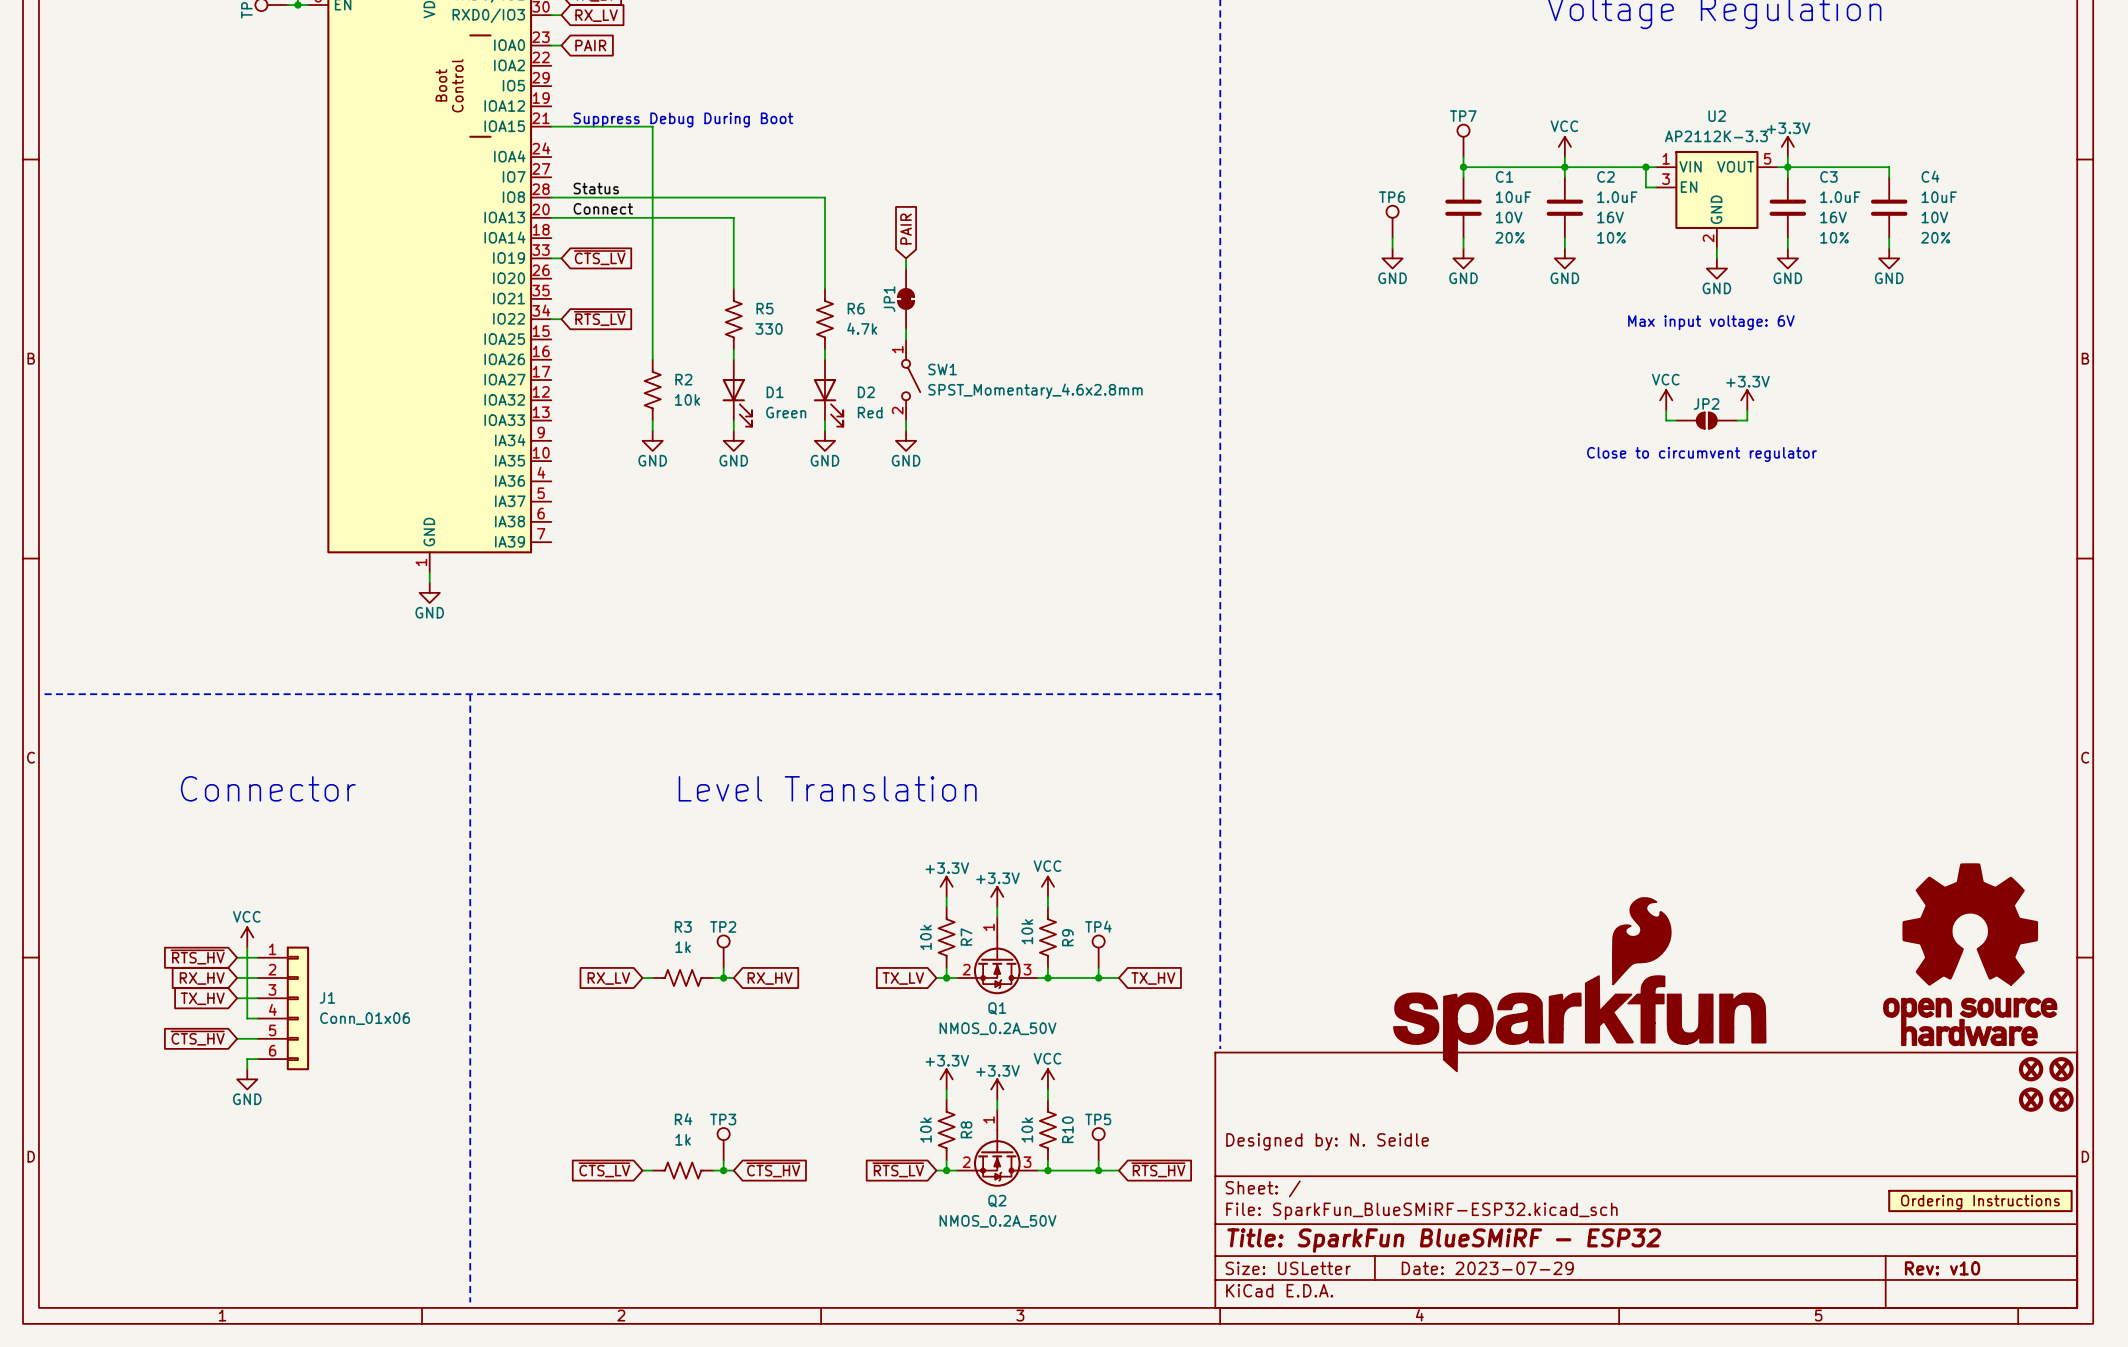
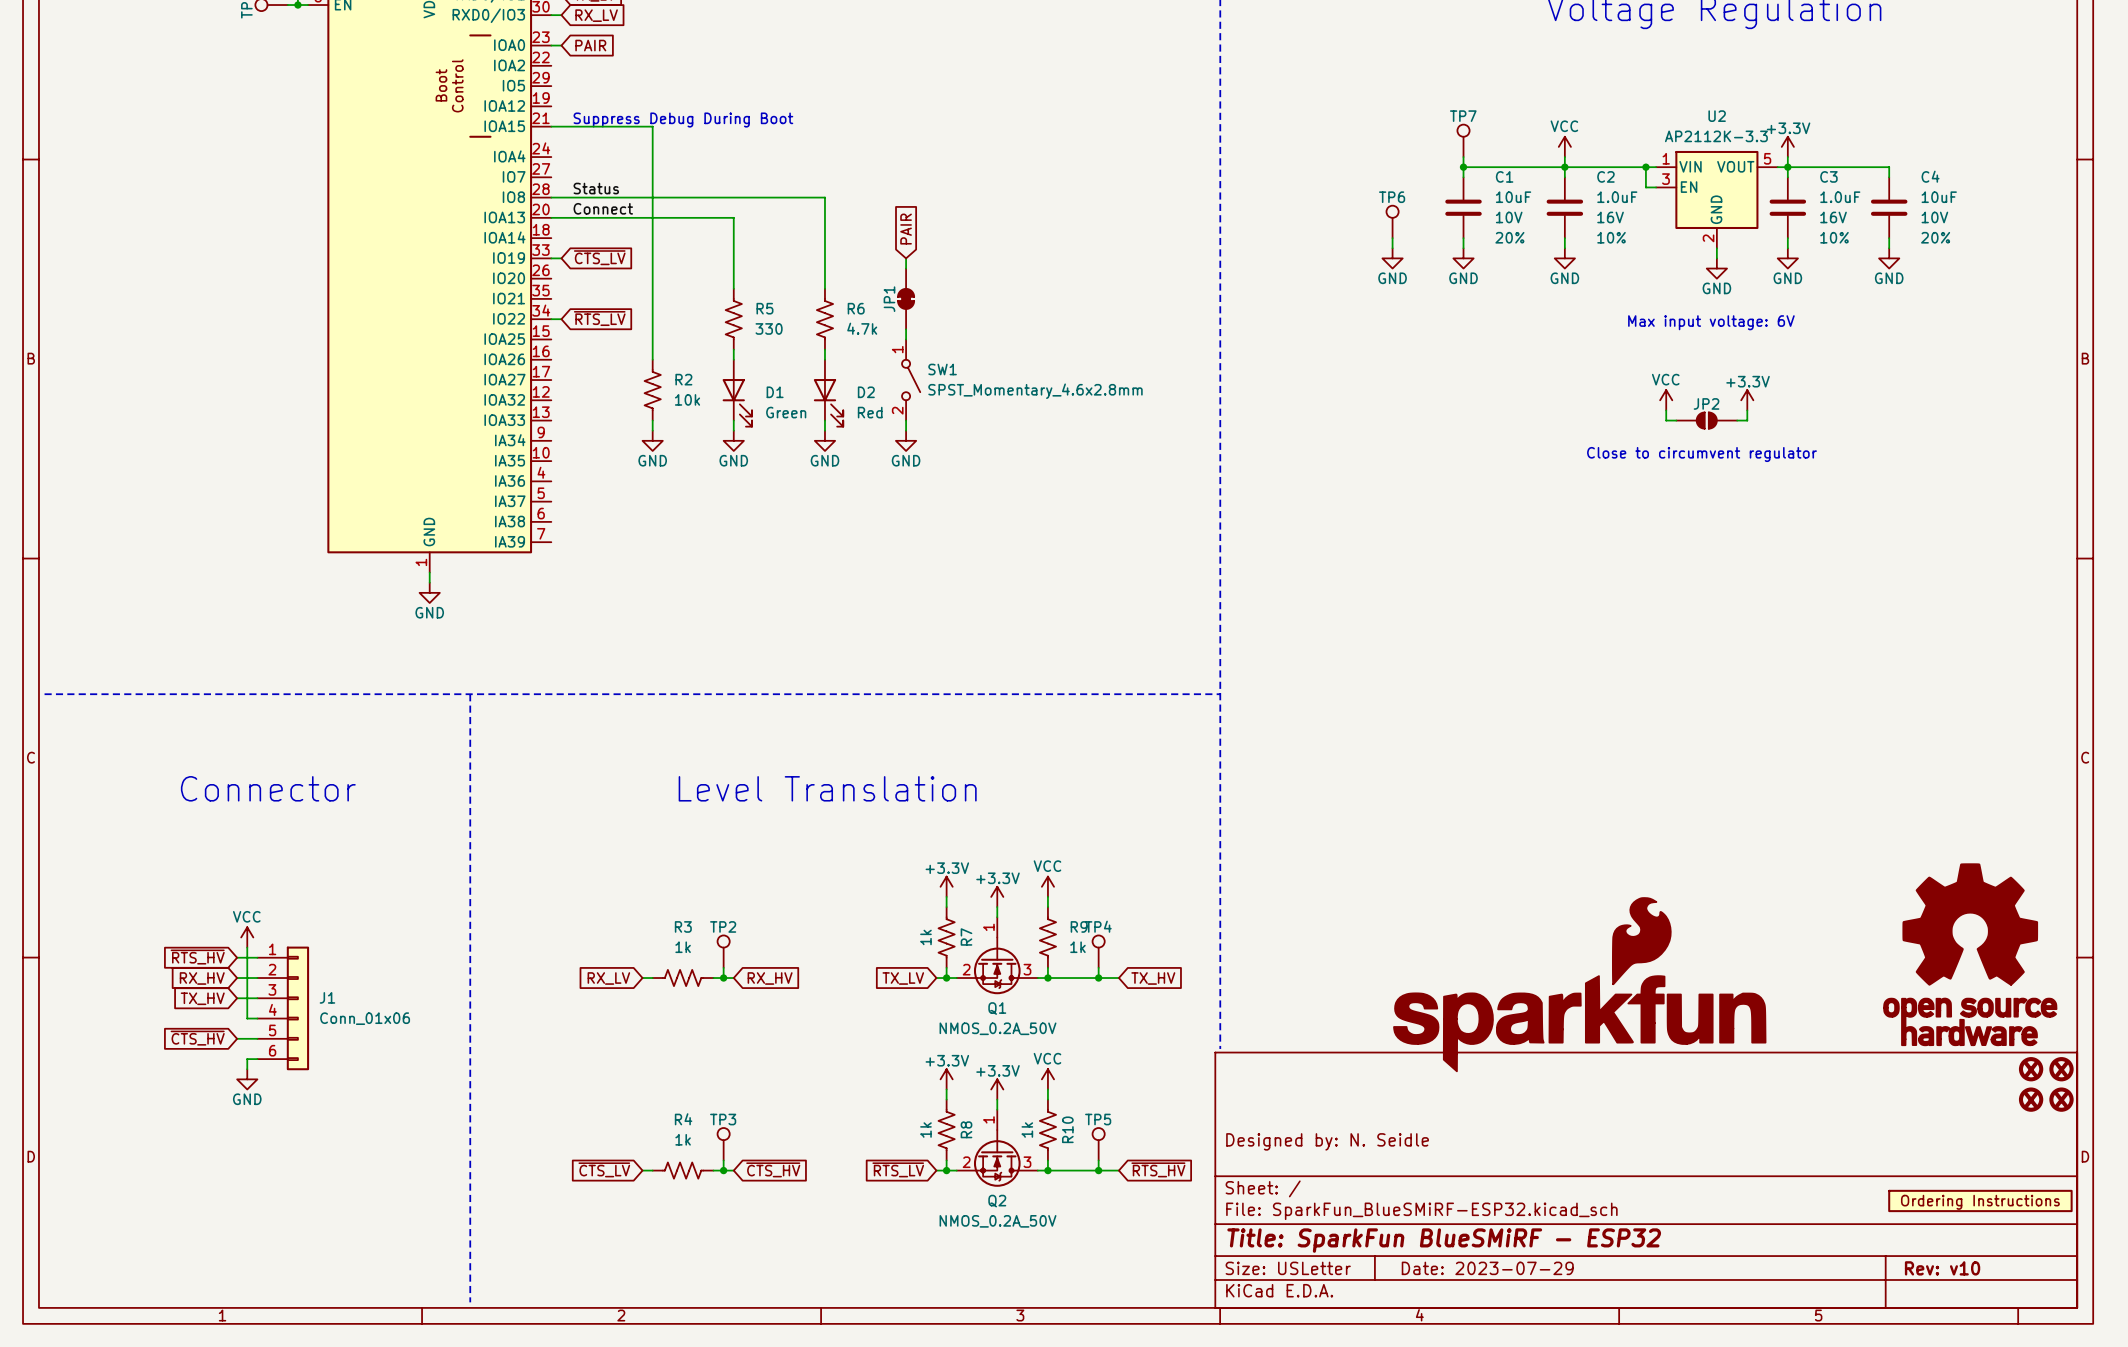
R9 value: 10k (1027, 931) -> 1k (1077, 947)
R7 value: 10k (925, 937) -> 1k (925, 937)
R9 name rotation: 0° (1067, 937) -> 90° clockwise (1079, 926)
R8 value: 10k (925, 1130) -> 1k (925, 1130)
R10 value: 10k (1027, 1130) -> 1k (1027, 1130)

